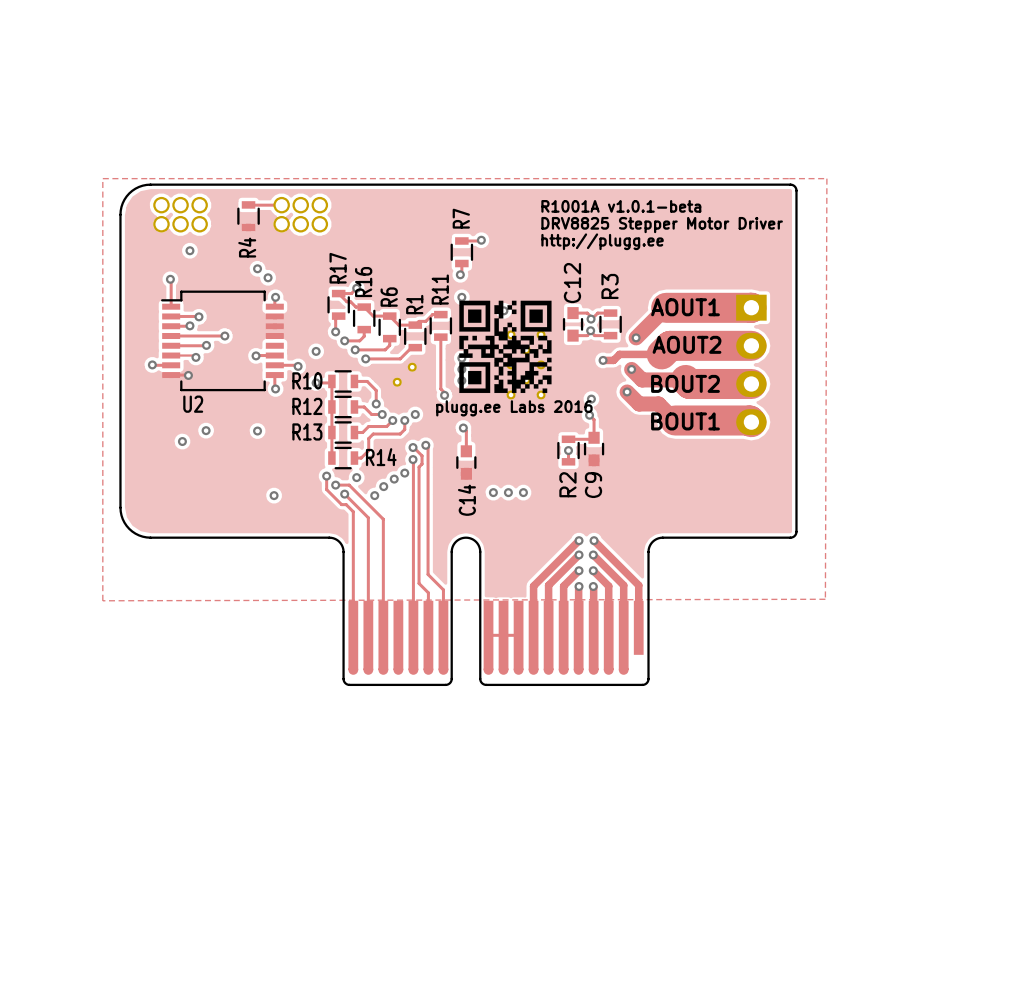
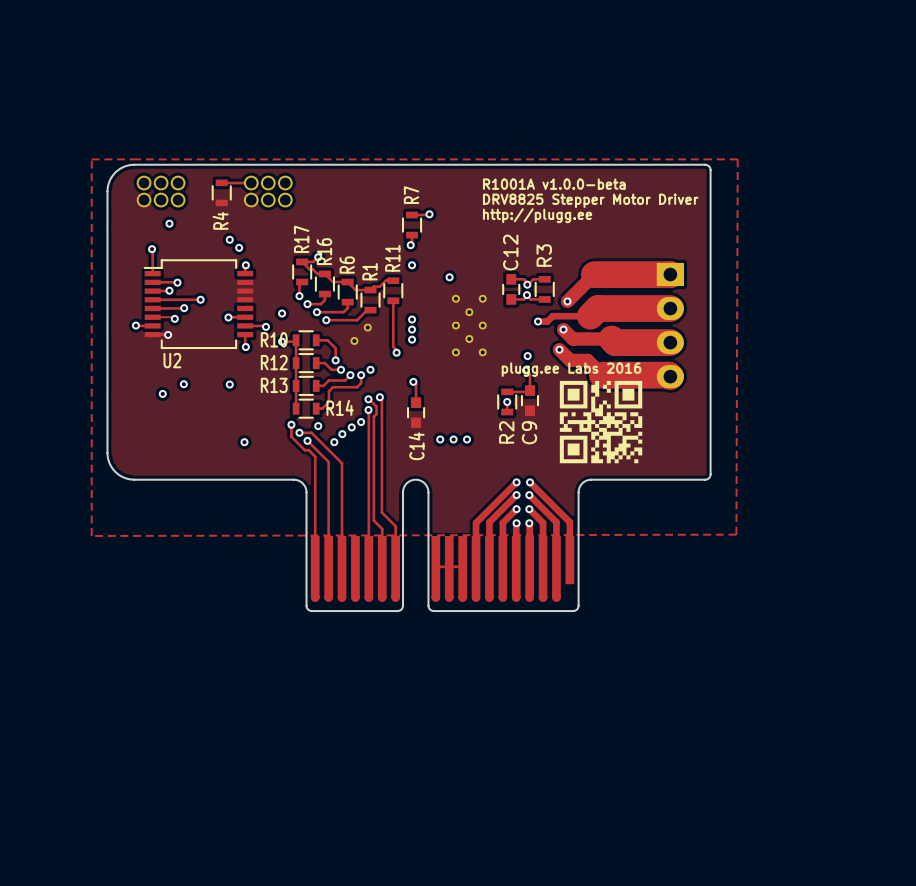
text: R1001A v1.0.1-beta (621, 206) -> R1001A v1.0.0-beta (554, 184)
text: AOUT1 (685, 307) -> none
text: AOUT2 (687, 344) -> none
drawing position: (505, 346) -> (601, 422)
text: BOUT2 (685, 383) -> none
text position: plugg.ee Labs 2016 (514, 408) -> plugg.ee Labs 2016 (571, 369)
text: BOUT1 (685, 421) -> none

